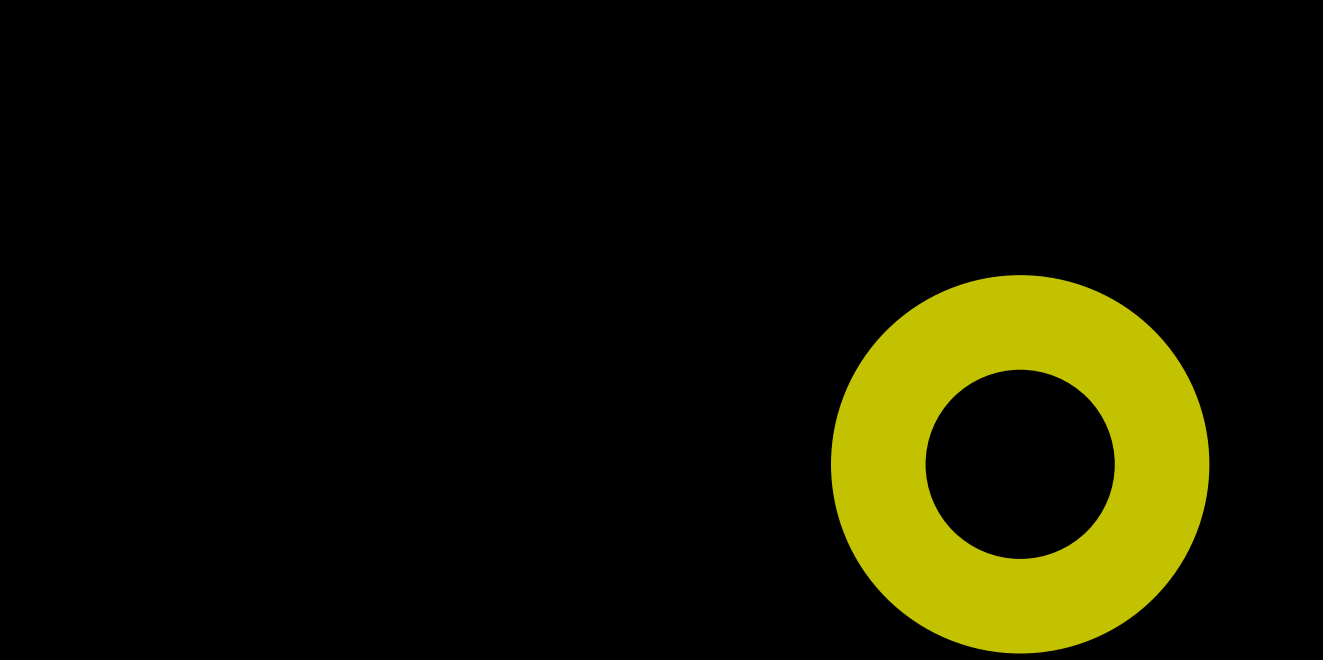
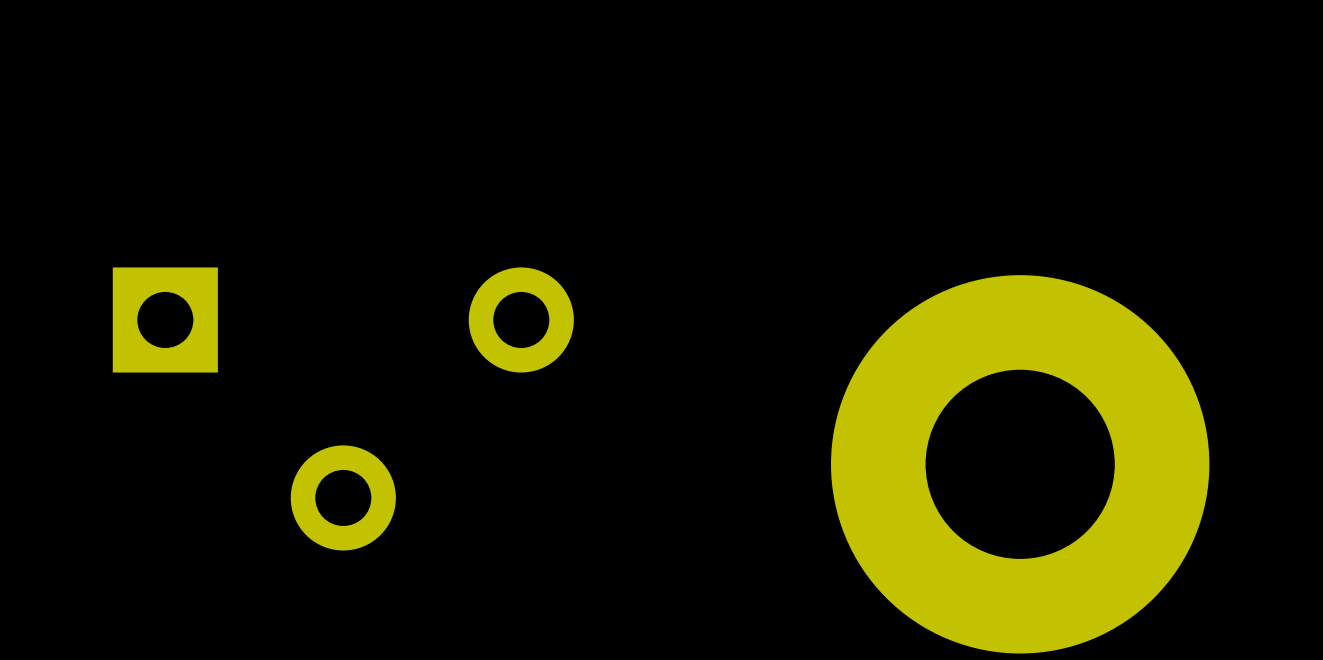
part: none -> (343, 408)

